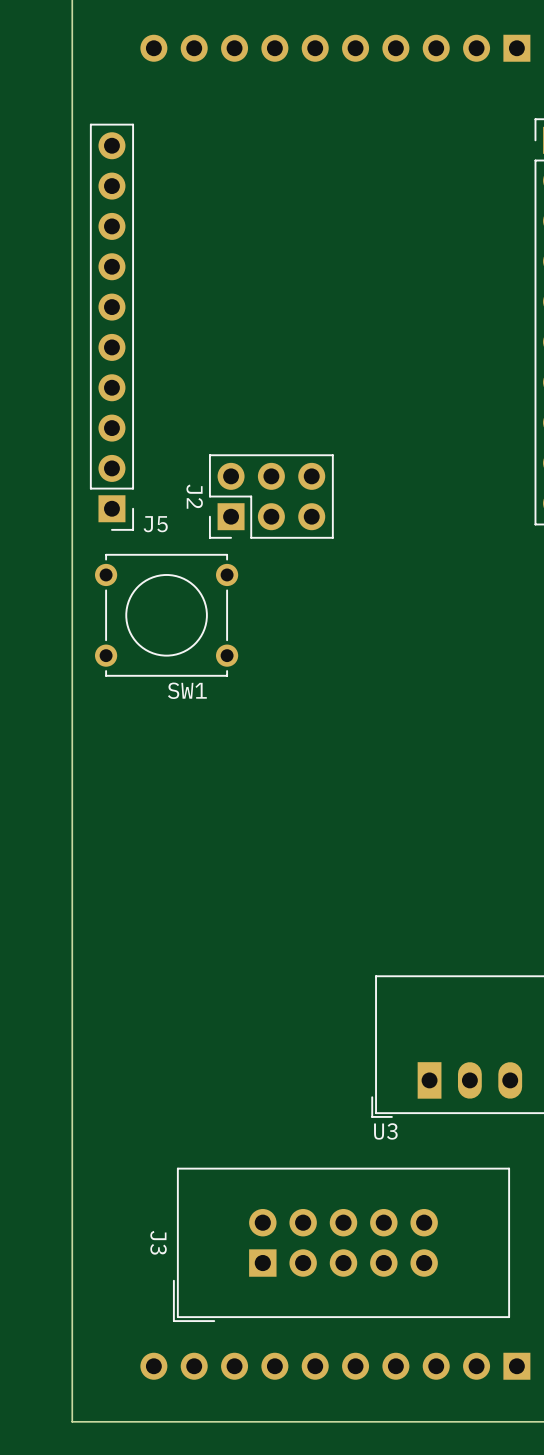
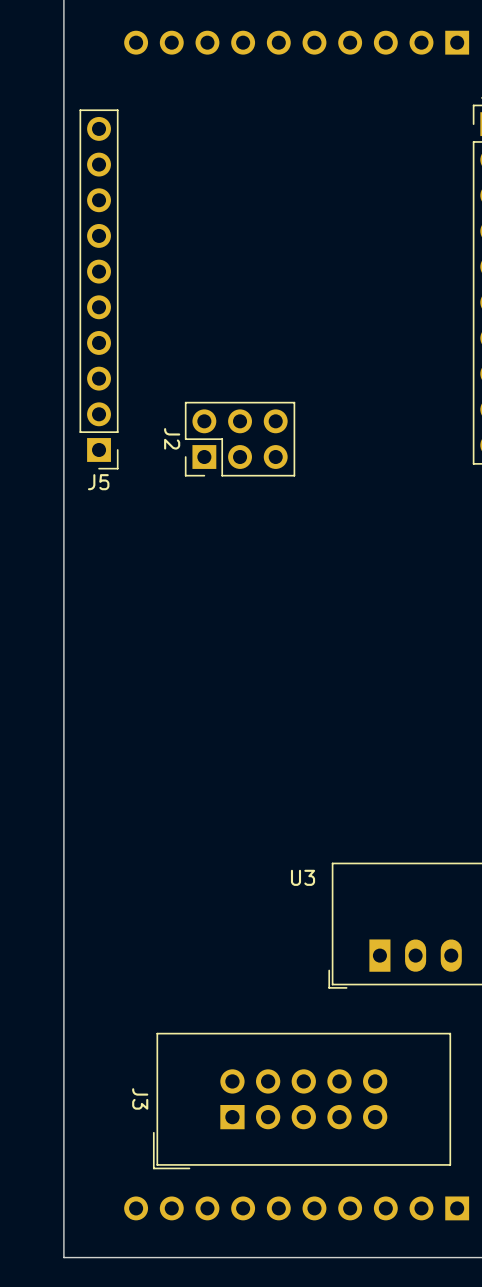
J5 name position: J5 (155, 524) -> J5 (98, 482)
SW1: (166, 615) -> none
U3 name position: U3 (385, 1131) -> U3 (303, 877)

